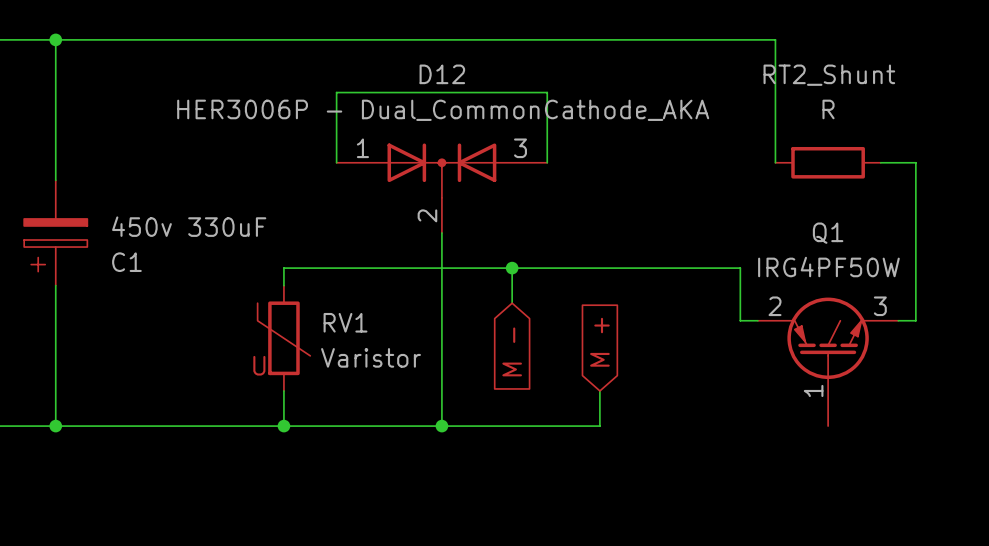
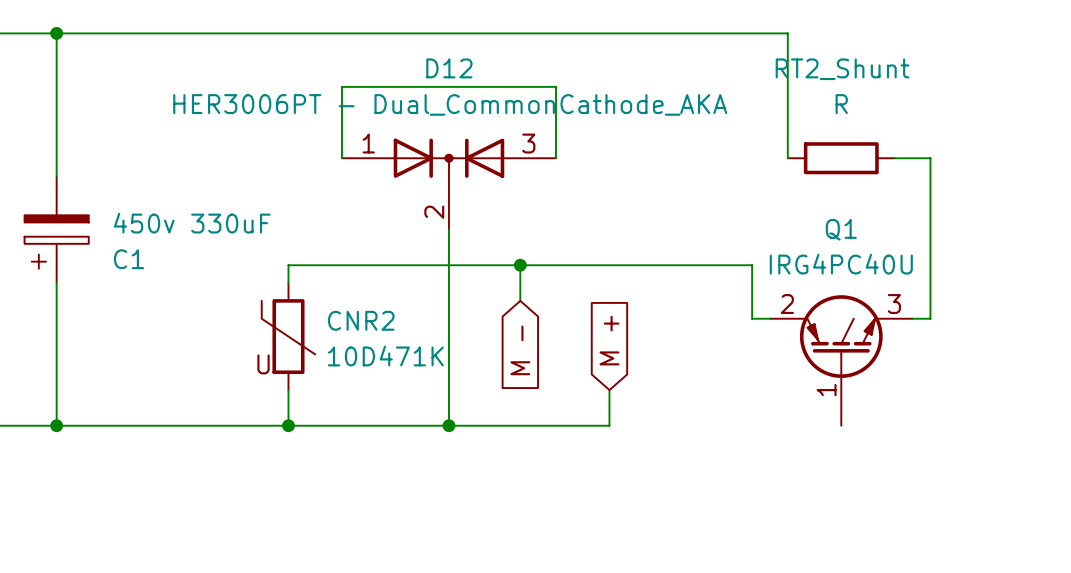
D12 value: HER3006P - Dual_CommonCathode_AKA (443, 110) -> HER3006PT - Dual_CommonCathode_AKA (450, 104)
Q1 value: IRG4PF50W (828, 267) -> IRG4PC40U (841, 264)
RV1 name: RV1 (345, 322) -> CNR2 (361, 320)
RV1 value: Varistor (371, 357) -> 10D471K (385, 356)

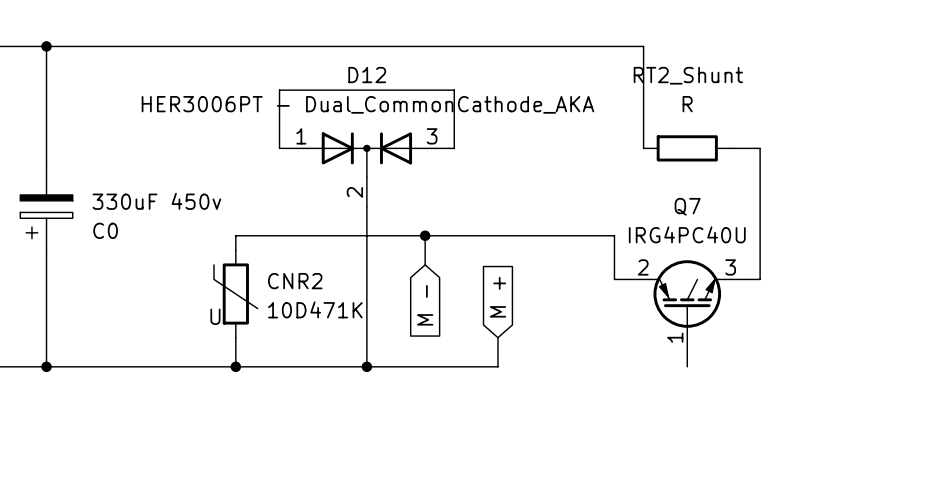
C1 value: 450v 330uF (192, 223) -> 330uF 450v (156, 201)
Q1 name: Q1 (841, 229) -> Q7 (687, 206)
C1 name: C1 (128, 259) -> C0 (105, 230)

